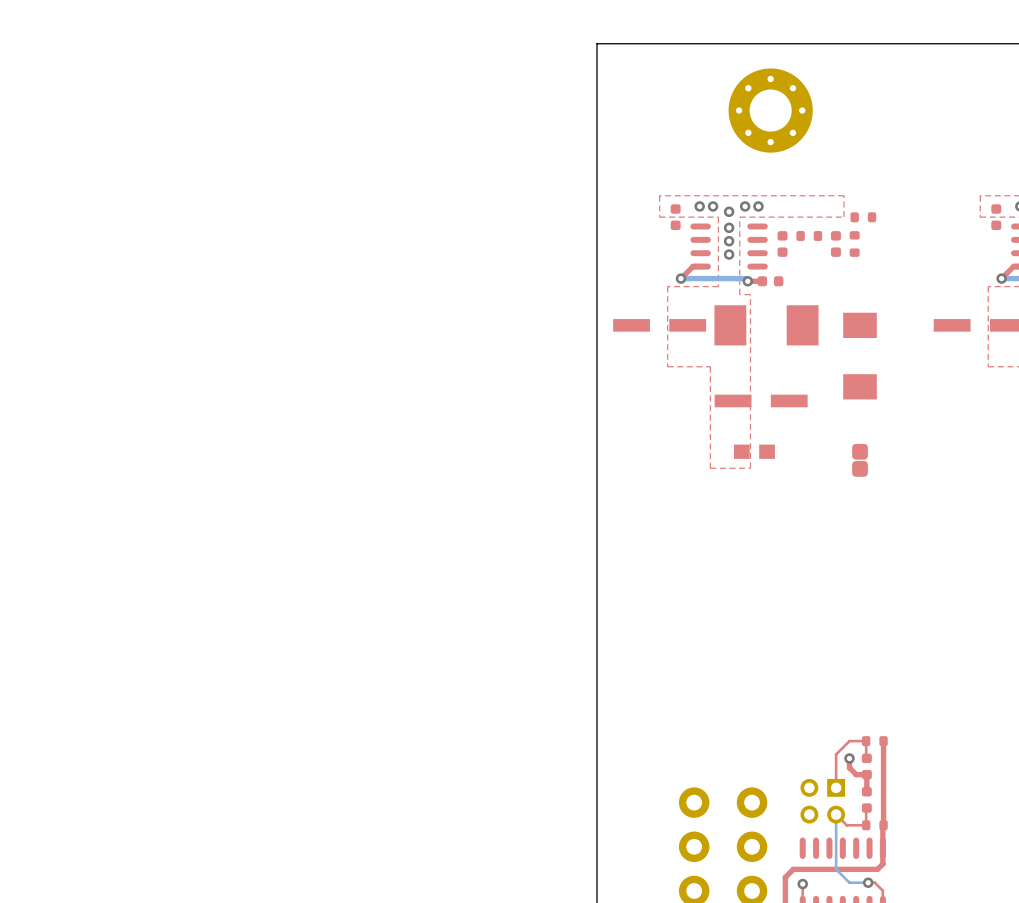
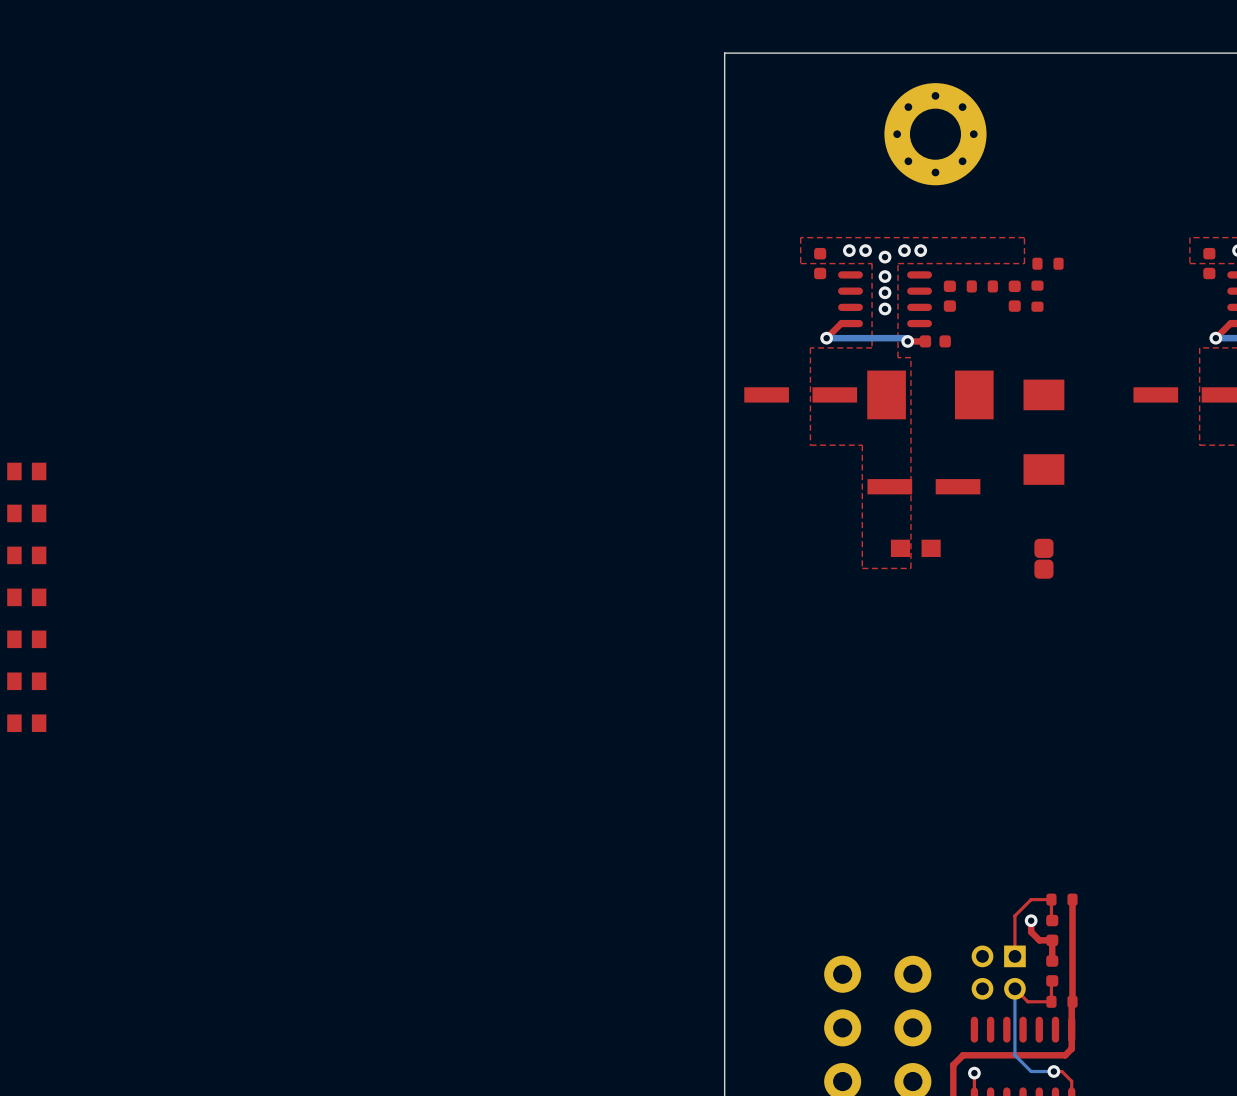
part: none -> (26, 471)
part: none -> (26, 513)
part: none -> (26, 555)
part: none -> (26, 597)
part: none -> (26, 639)
part: none -> (26, 681)
part: none -> (26, 723)

